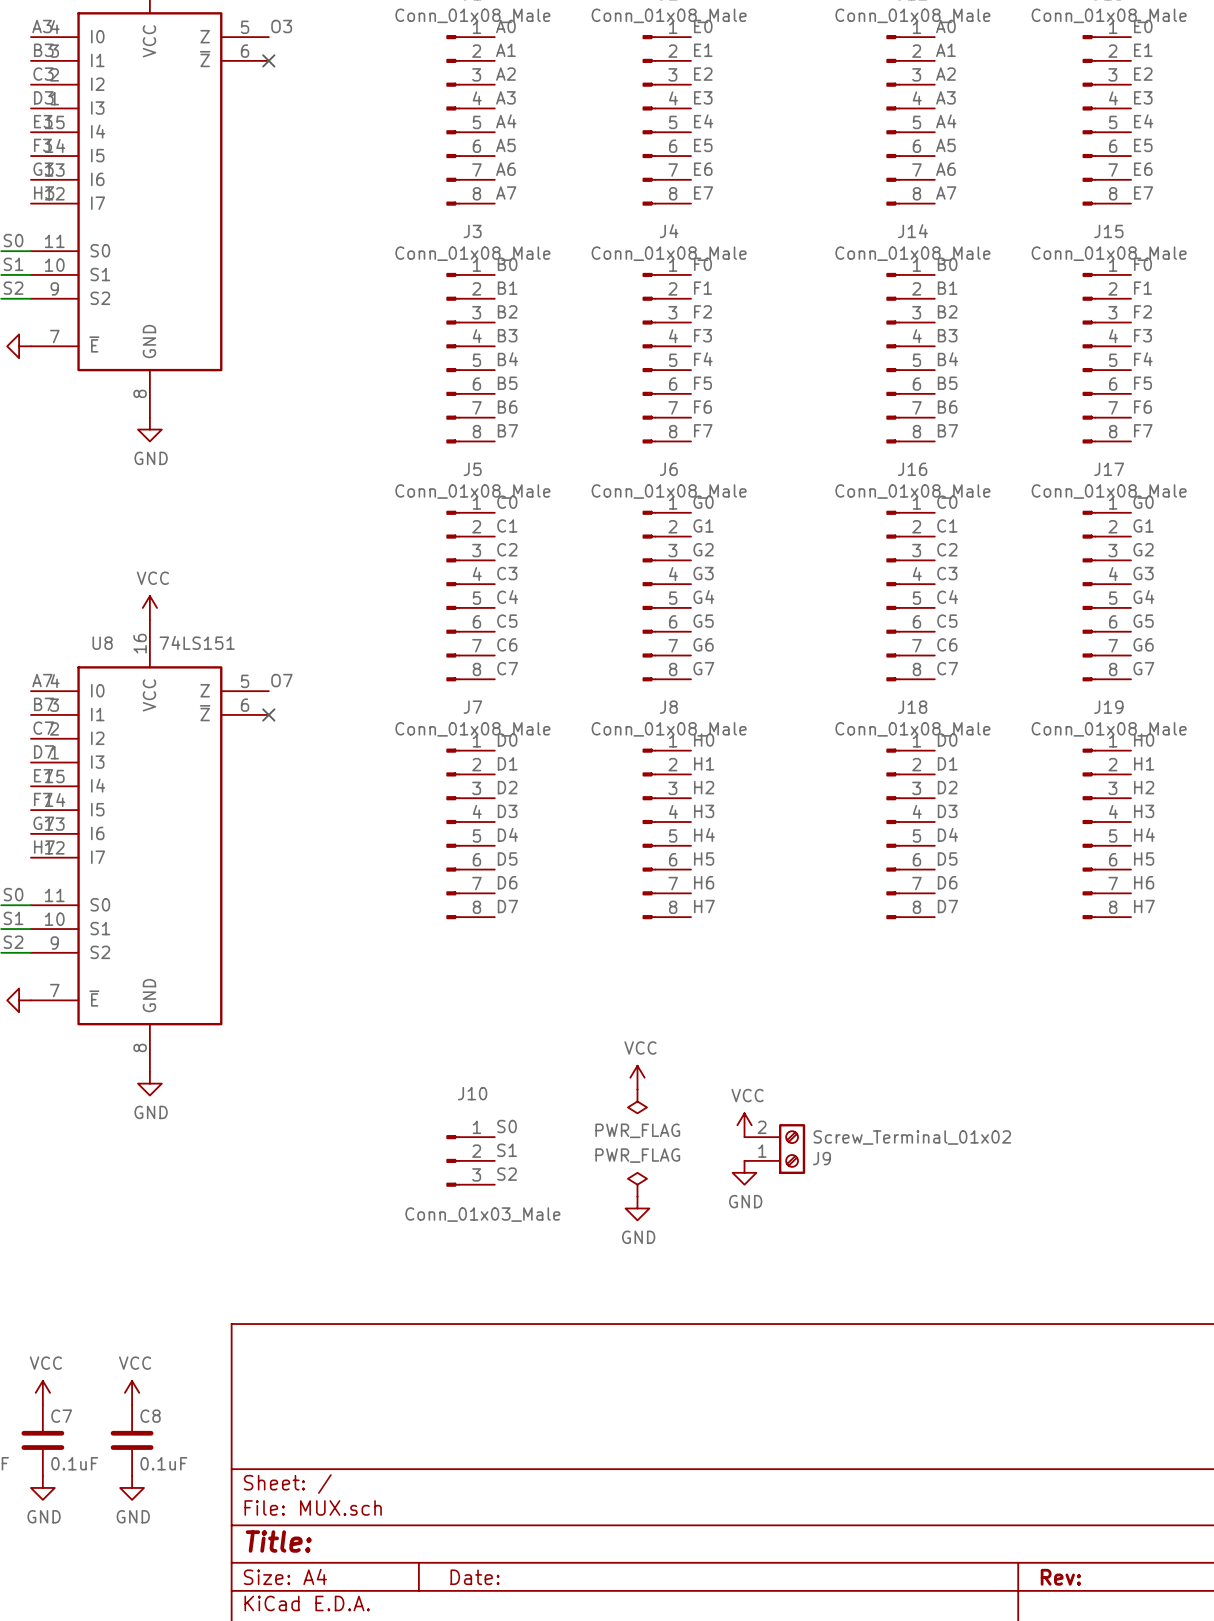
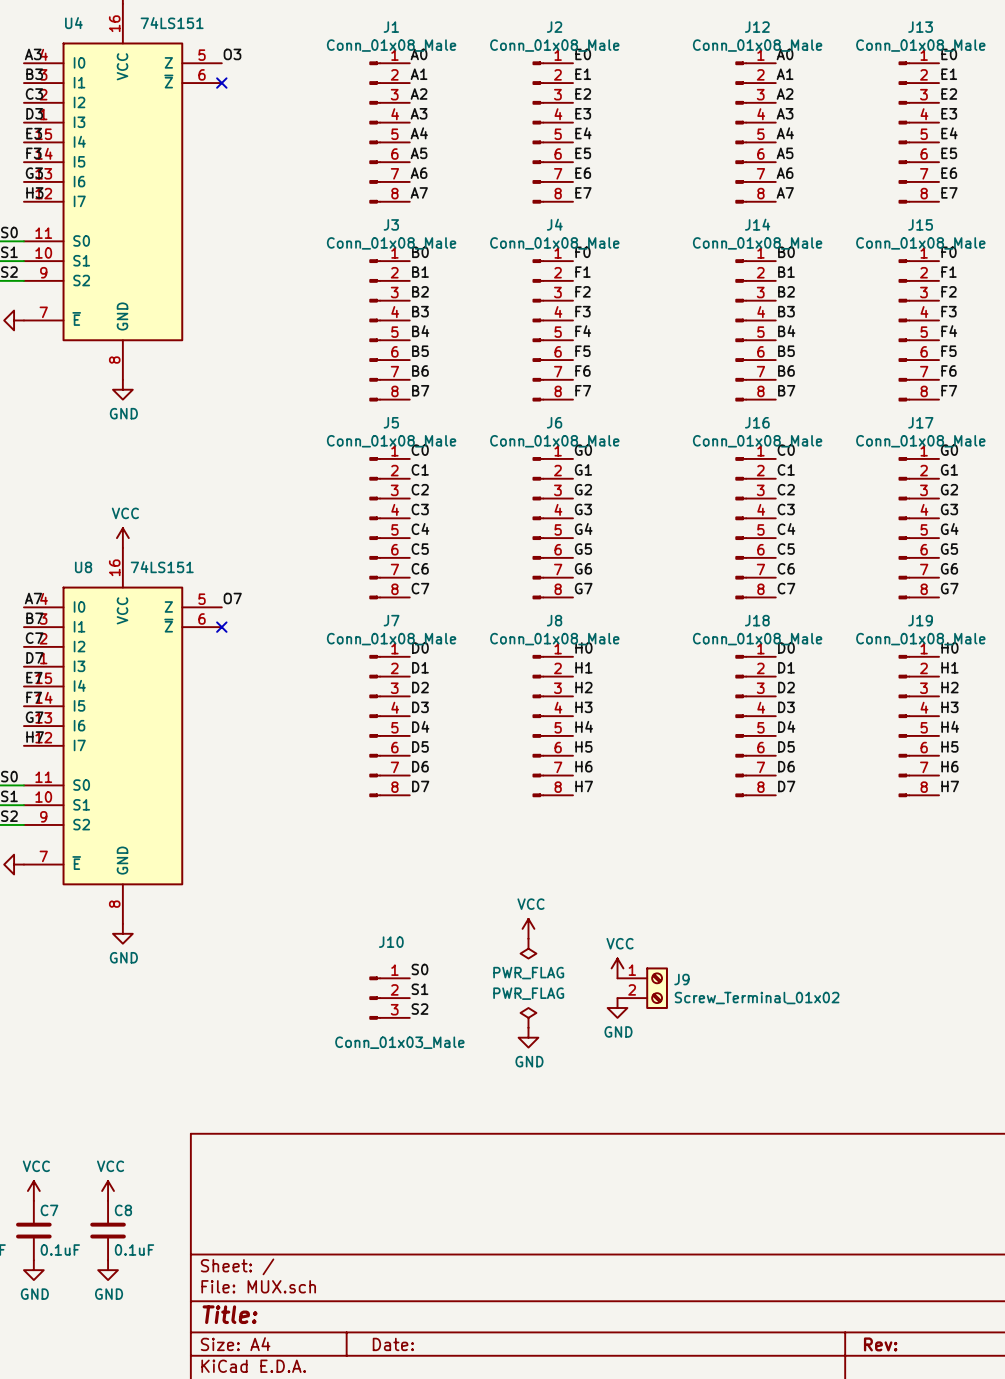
J9 flip: as is (792, 1149) -> up-down (657, 988)

